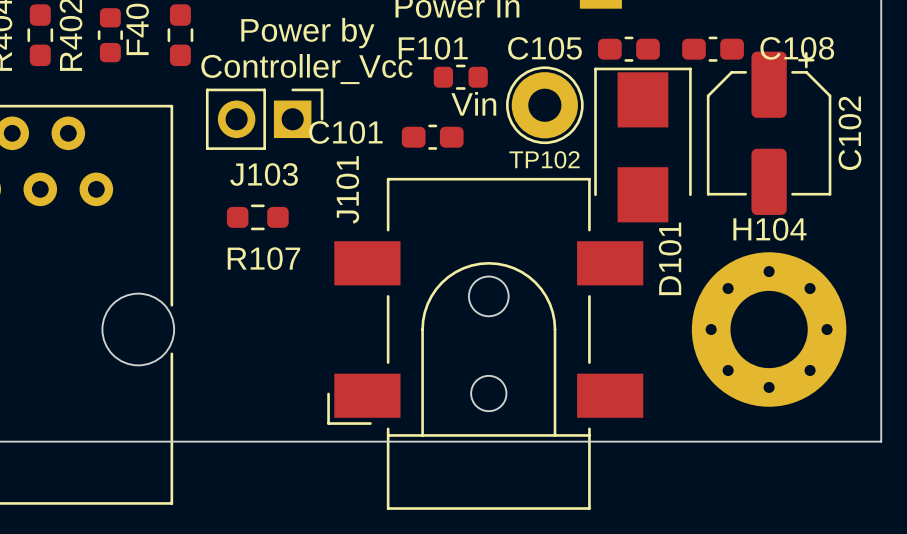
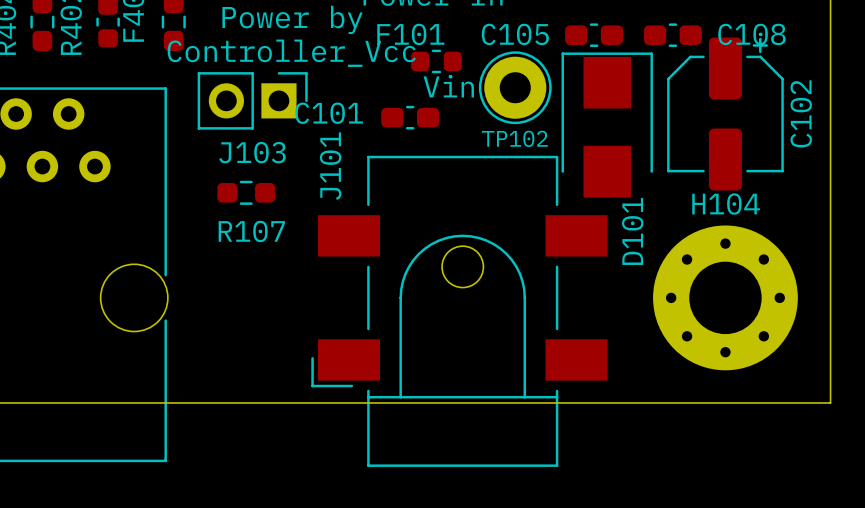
J101 footprint: [327, 177, 644, 510] -> [311, 155, 608, 467]

